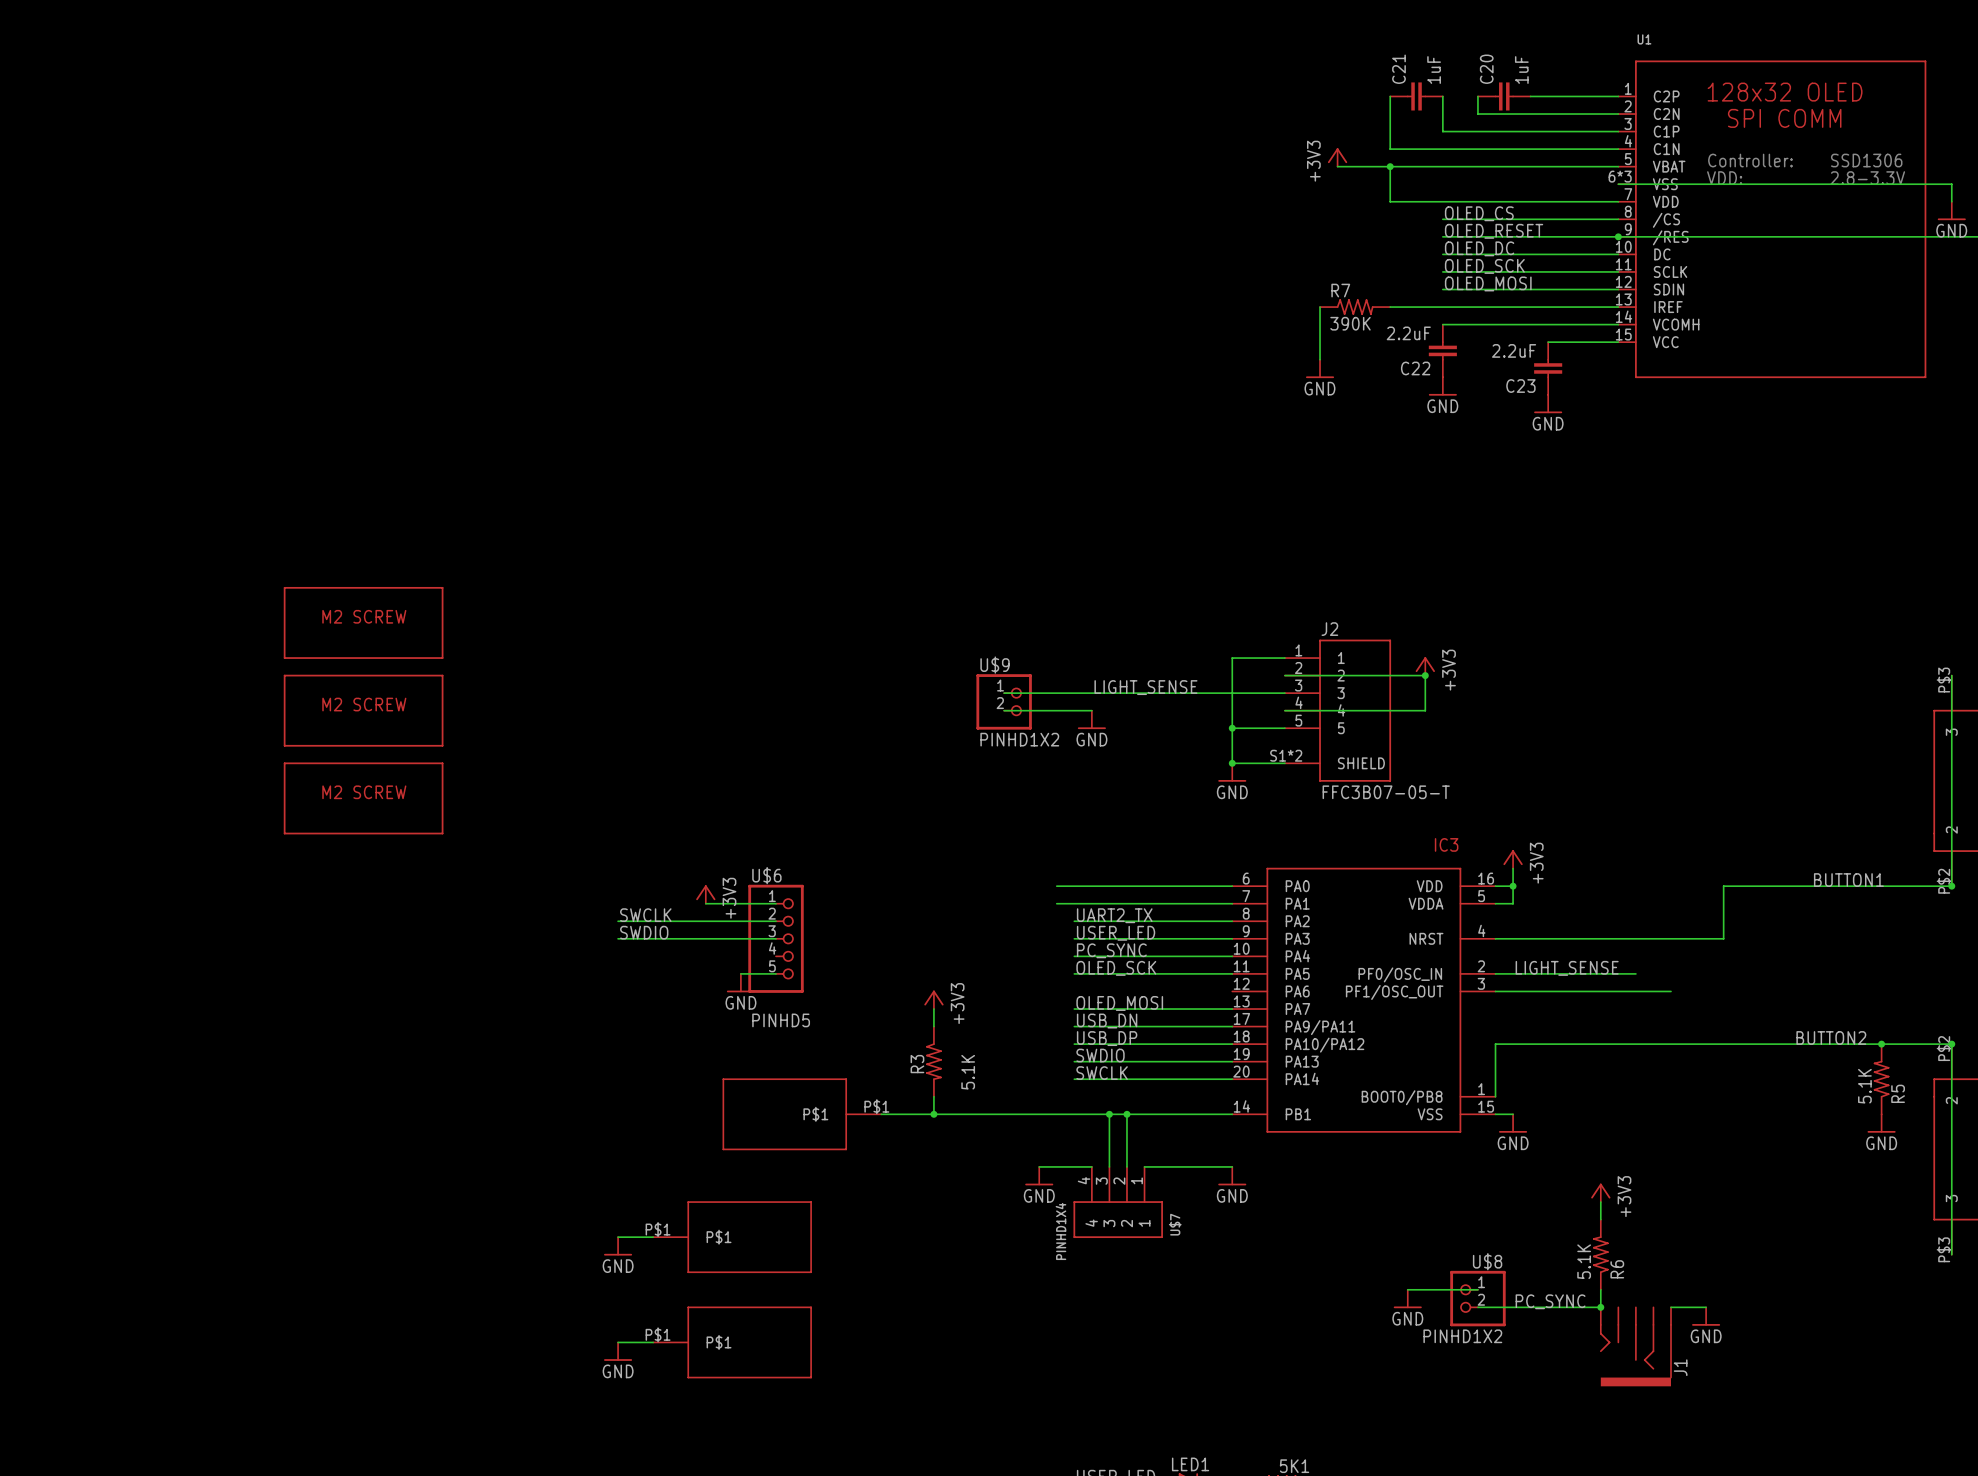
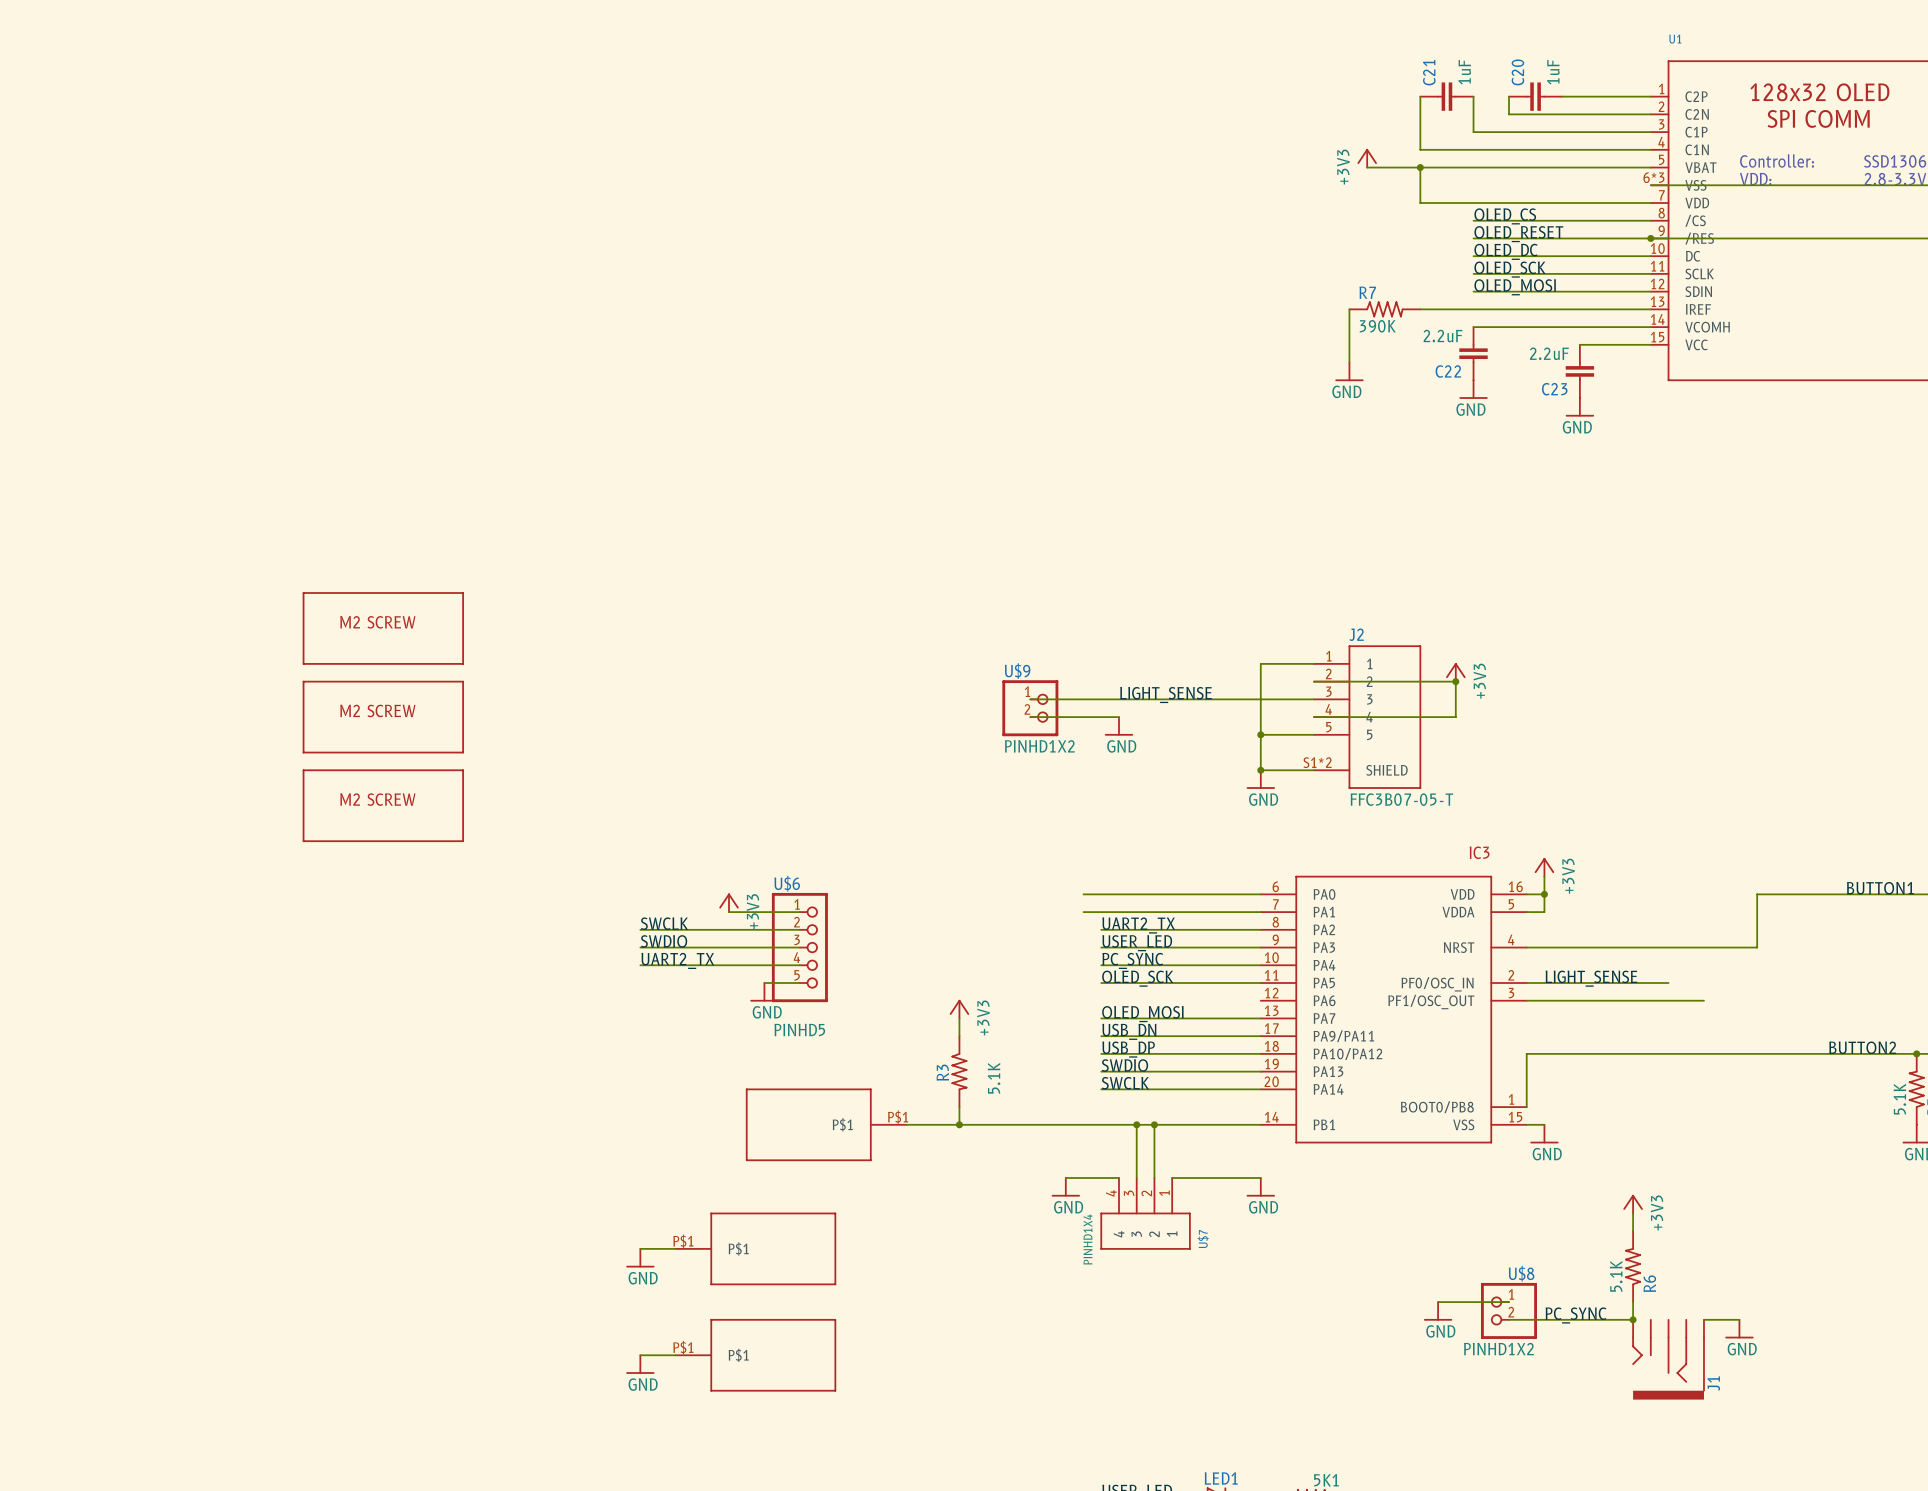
label: none -> UART2_TX (677, 960)
wire: none -> (640, 965) (799, 965)

